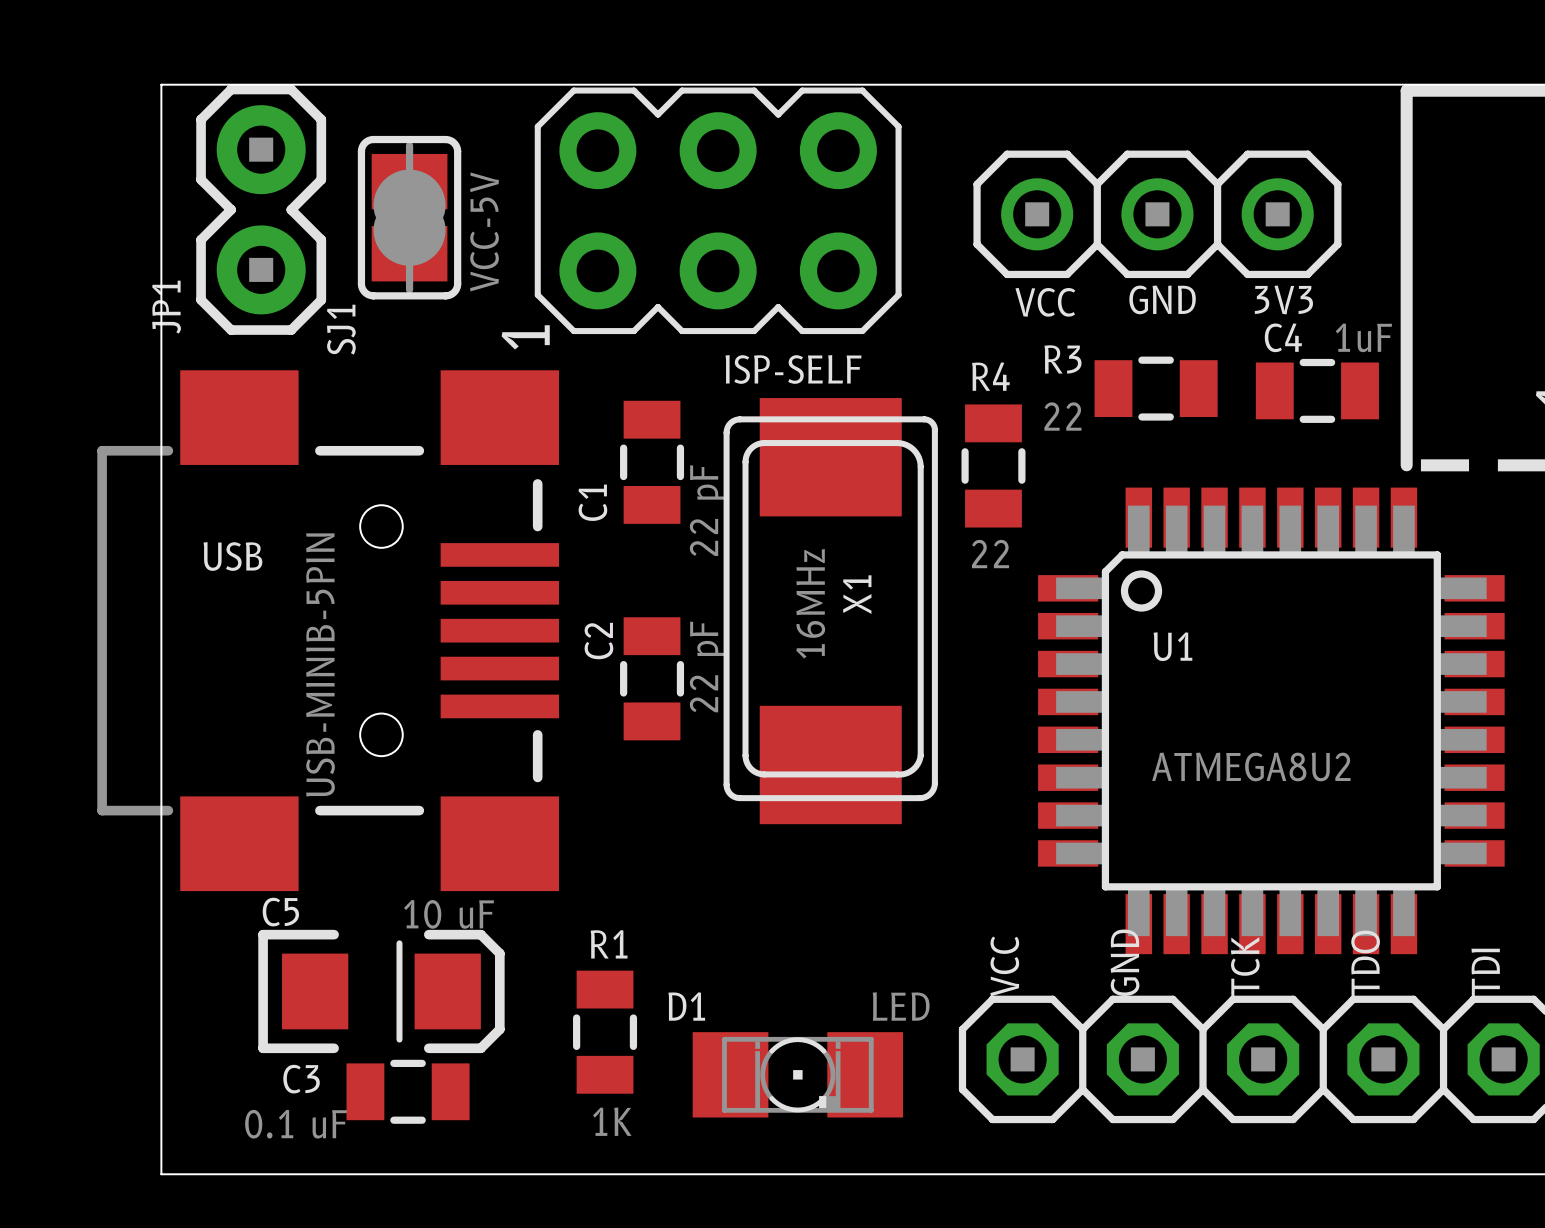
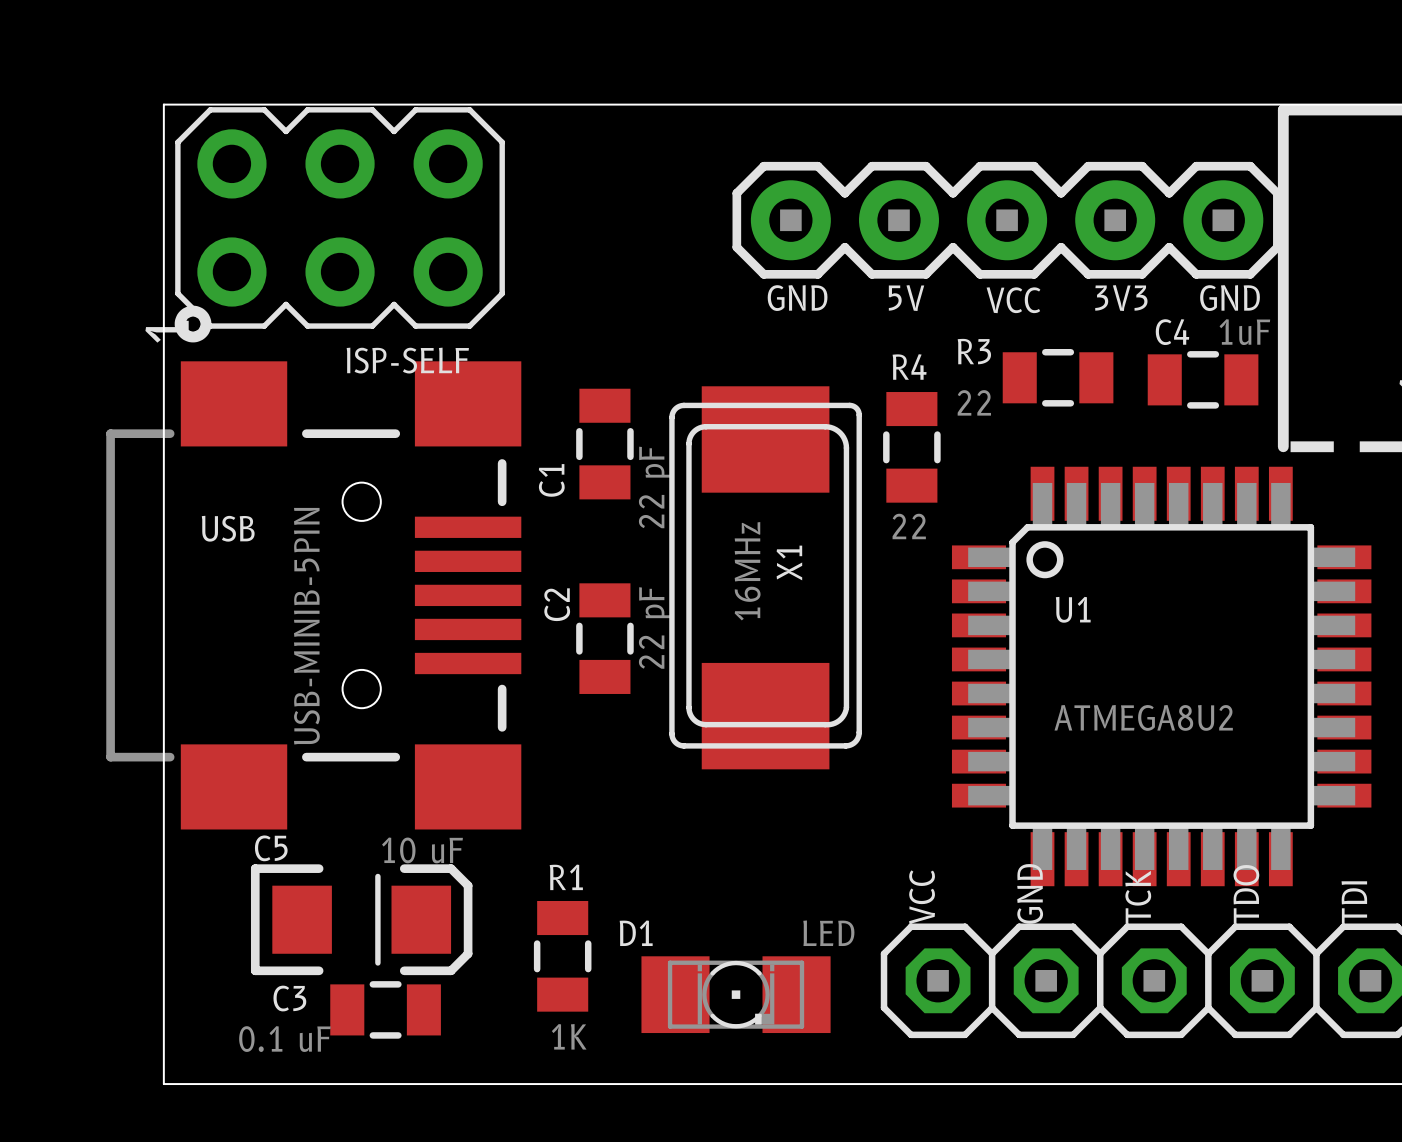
JP1: (261, 209) -> none
ISP-SELF position: (718, 210) -> (340, 217)
part: none -> (1007, 220)
part: (1157, 214) -> none
SJ1: VCC-5V (409, 217) -> none
text: none -> GND (797, 298)
text: none -> 5V (906, 298)
text: GND (1162, 299) -> 3V3 (1121, 298)
text: 3V3 (1283, 299) -> GND (1230, 298)
text position: VCC (1045, 302) -> VCC (1013, 300)
drawing: none -> [174, 305, 212, 343]

